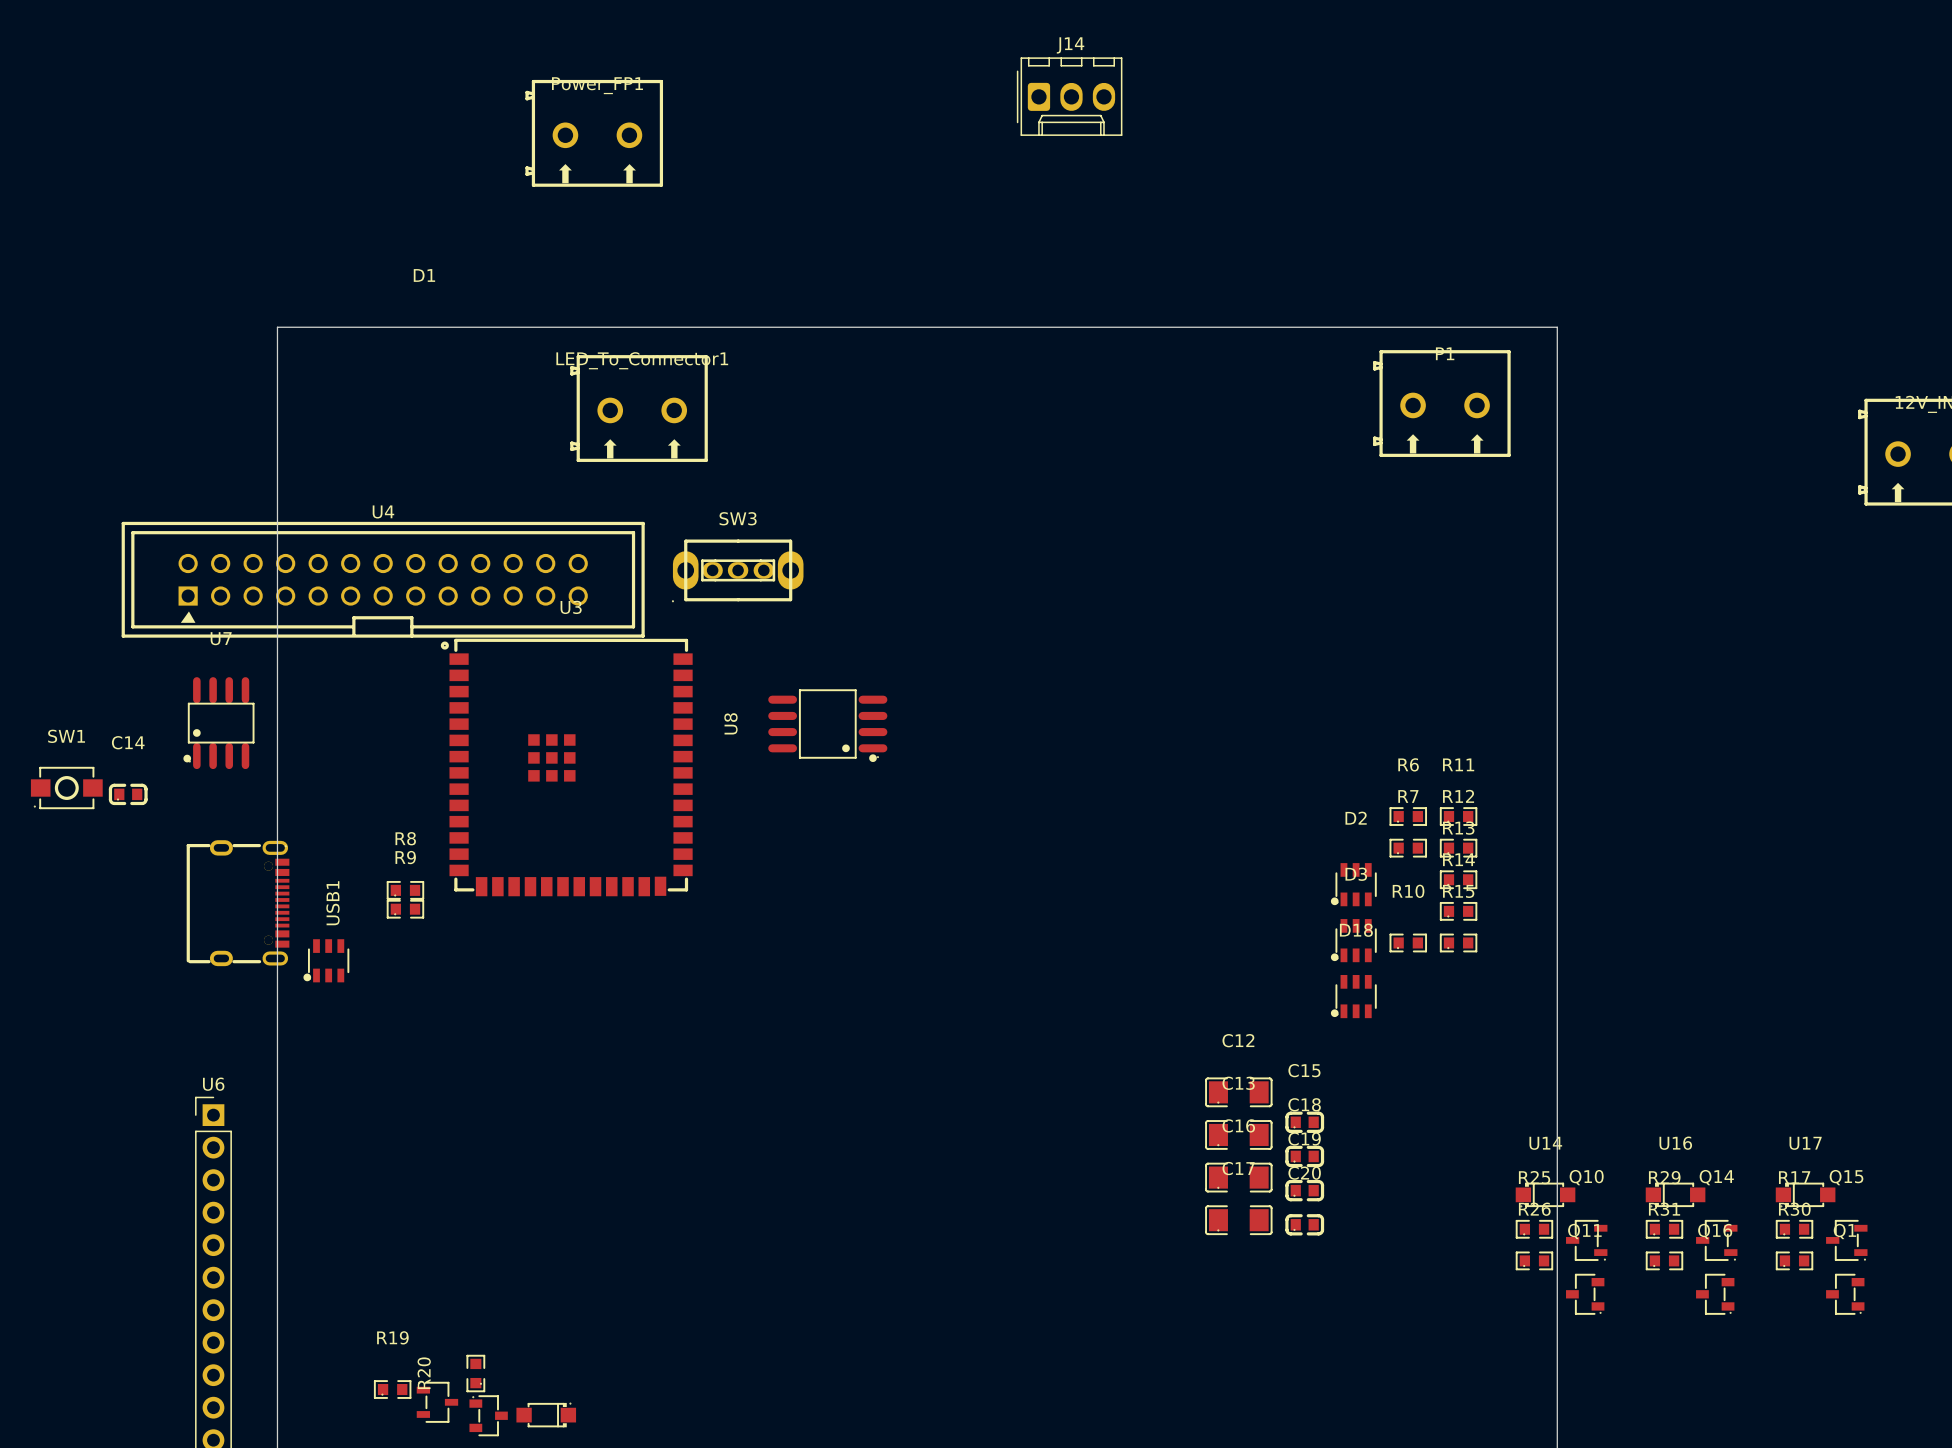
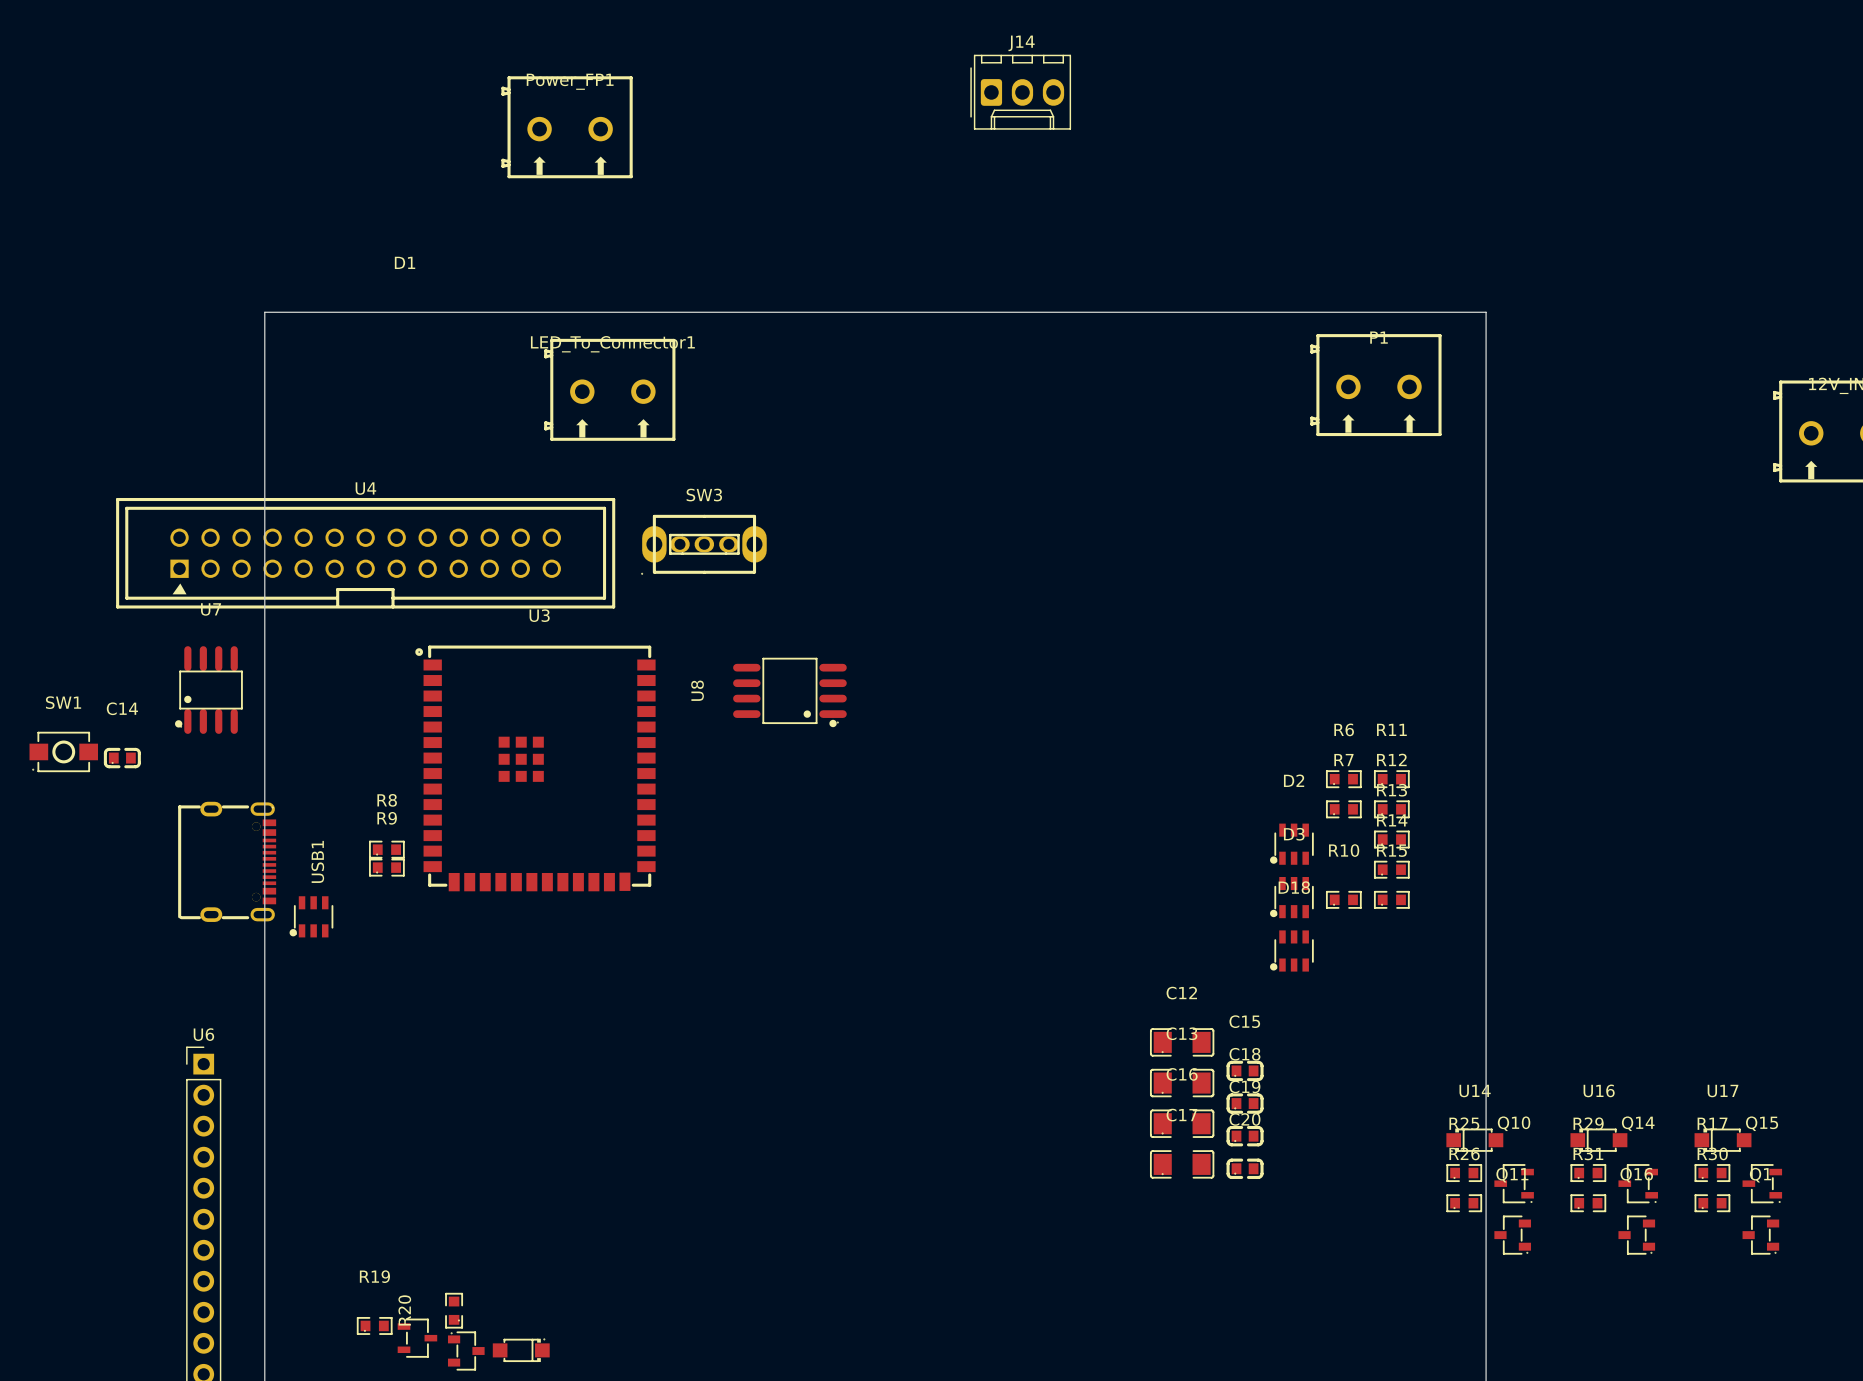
U3 position: (566, 767) -> (535, 768)

